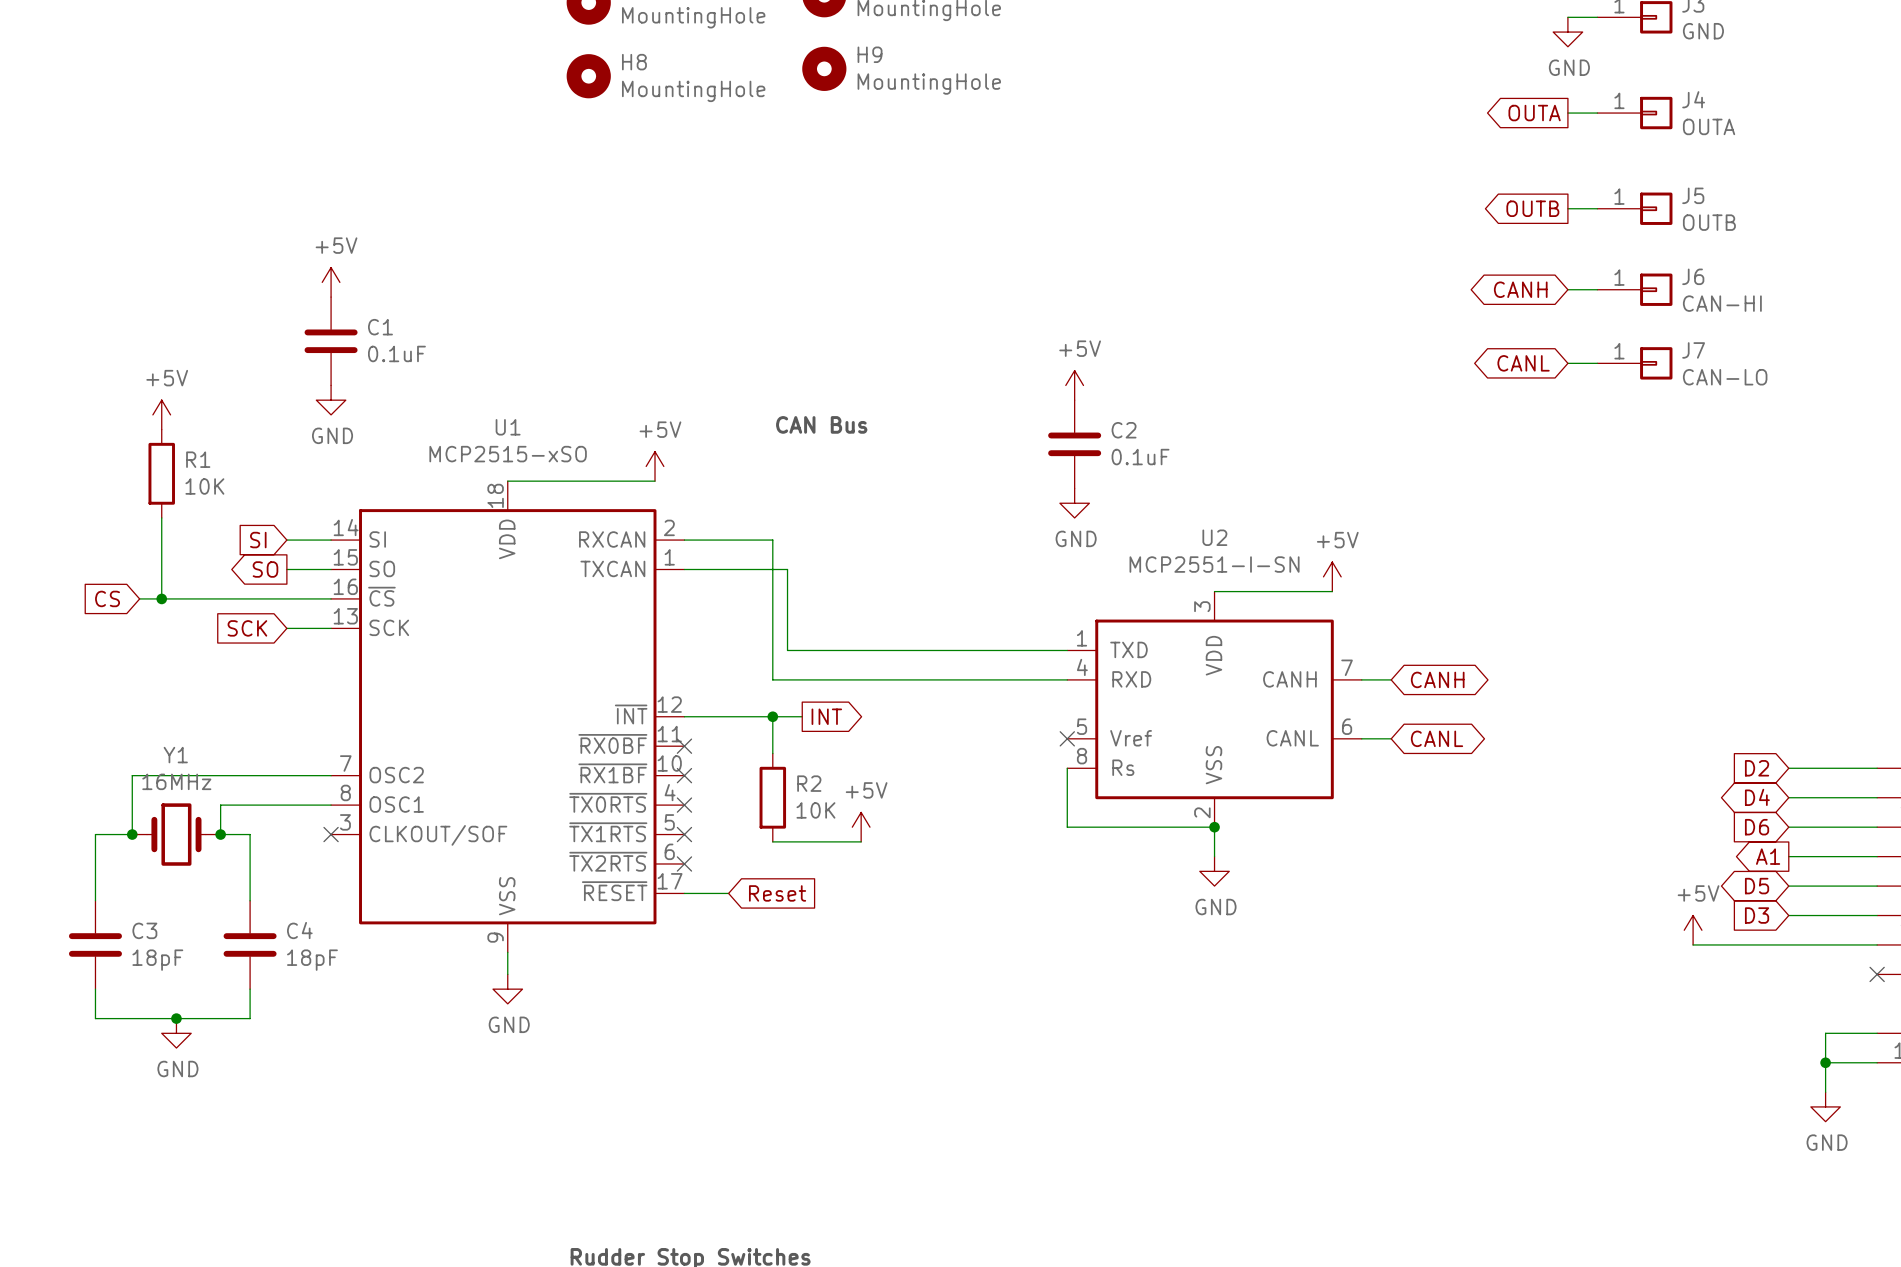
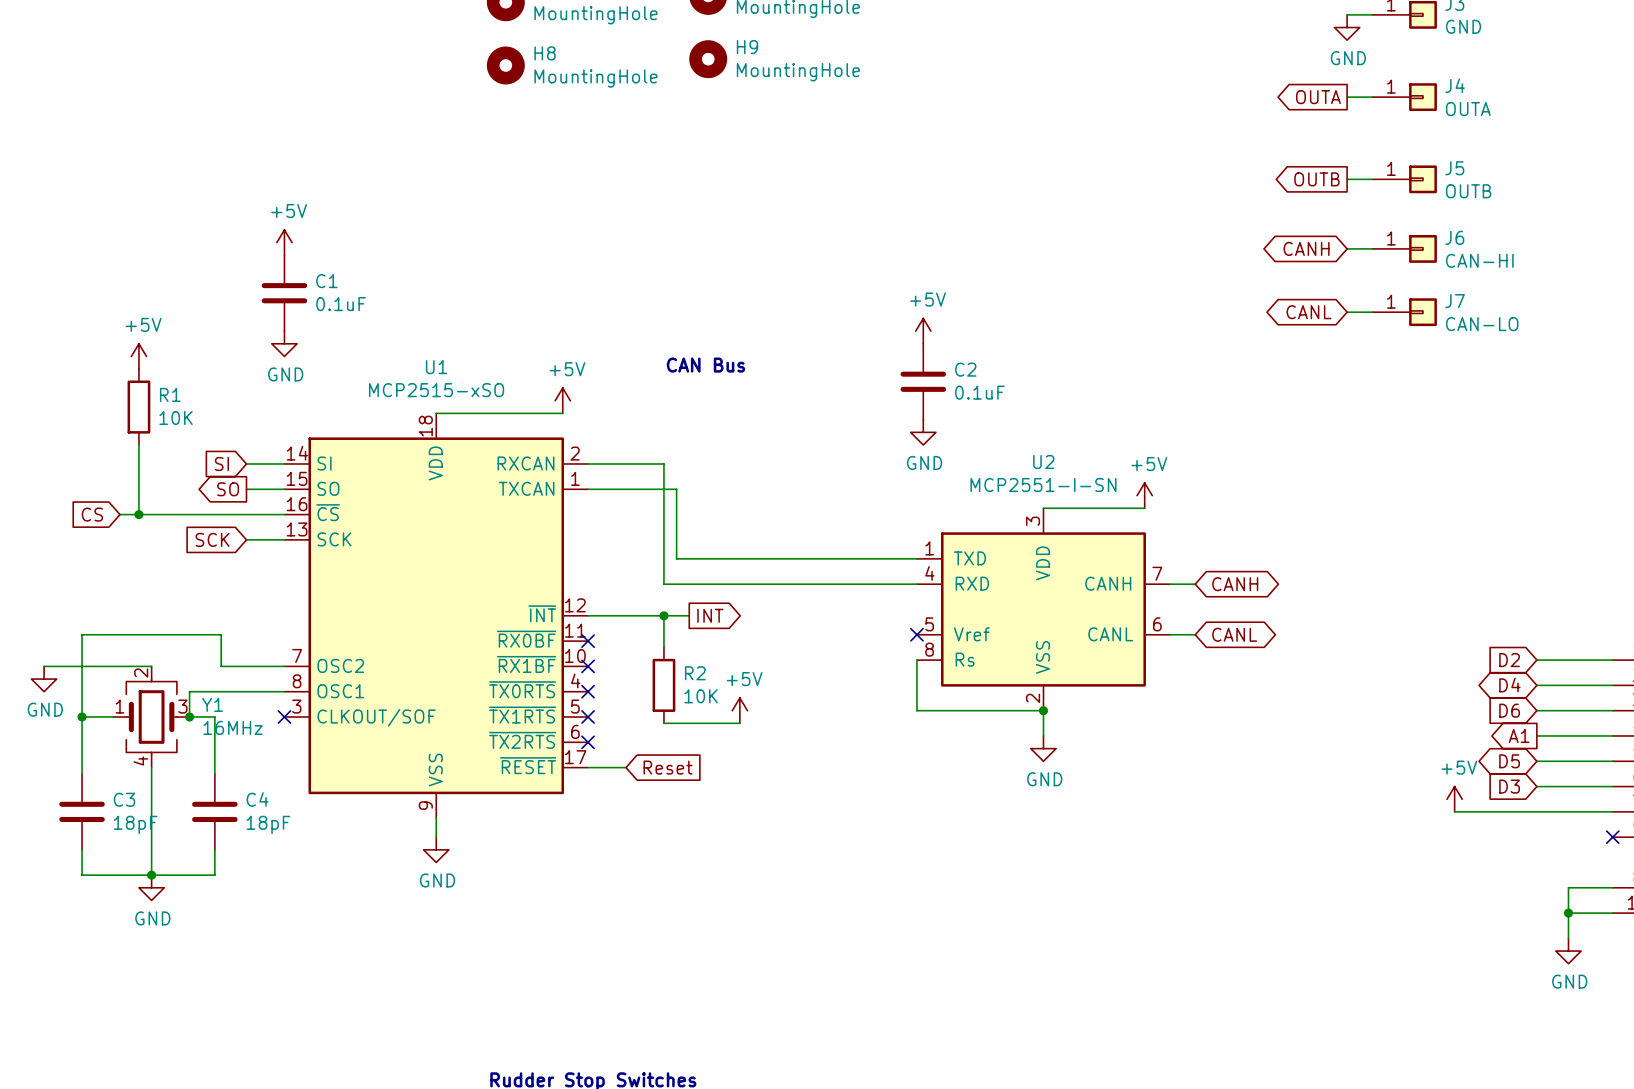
Y1 name position: Y1 (175, 755) -> Y1 (212, 704)
wire: (132, 775) (132, 834) -> (113, 666) (44, 666)
wire: (176, 775) (257, 775) -> (82, 717) (82, 634) (221, 634) (221, 666)
Y1 value position: 16MHz (176, 781) -> 16MHz (233, 727)
power symbol: none -> GND (44, 679)
Y1 symbol: [132, 803, 221, 866] -> [113, 666, 190, 768]
junction position: (132, 834) -> (82, 717)
wire: none -> (151, 767) (151, 875)

